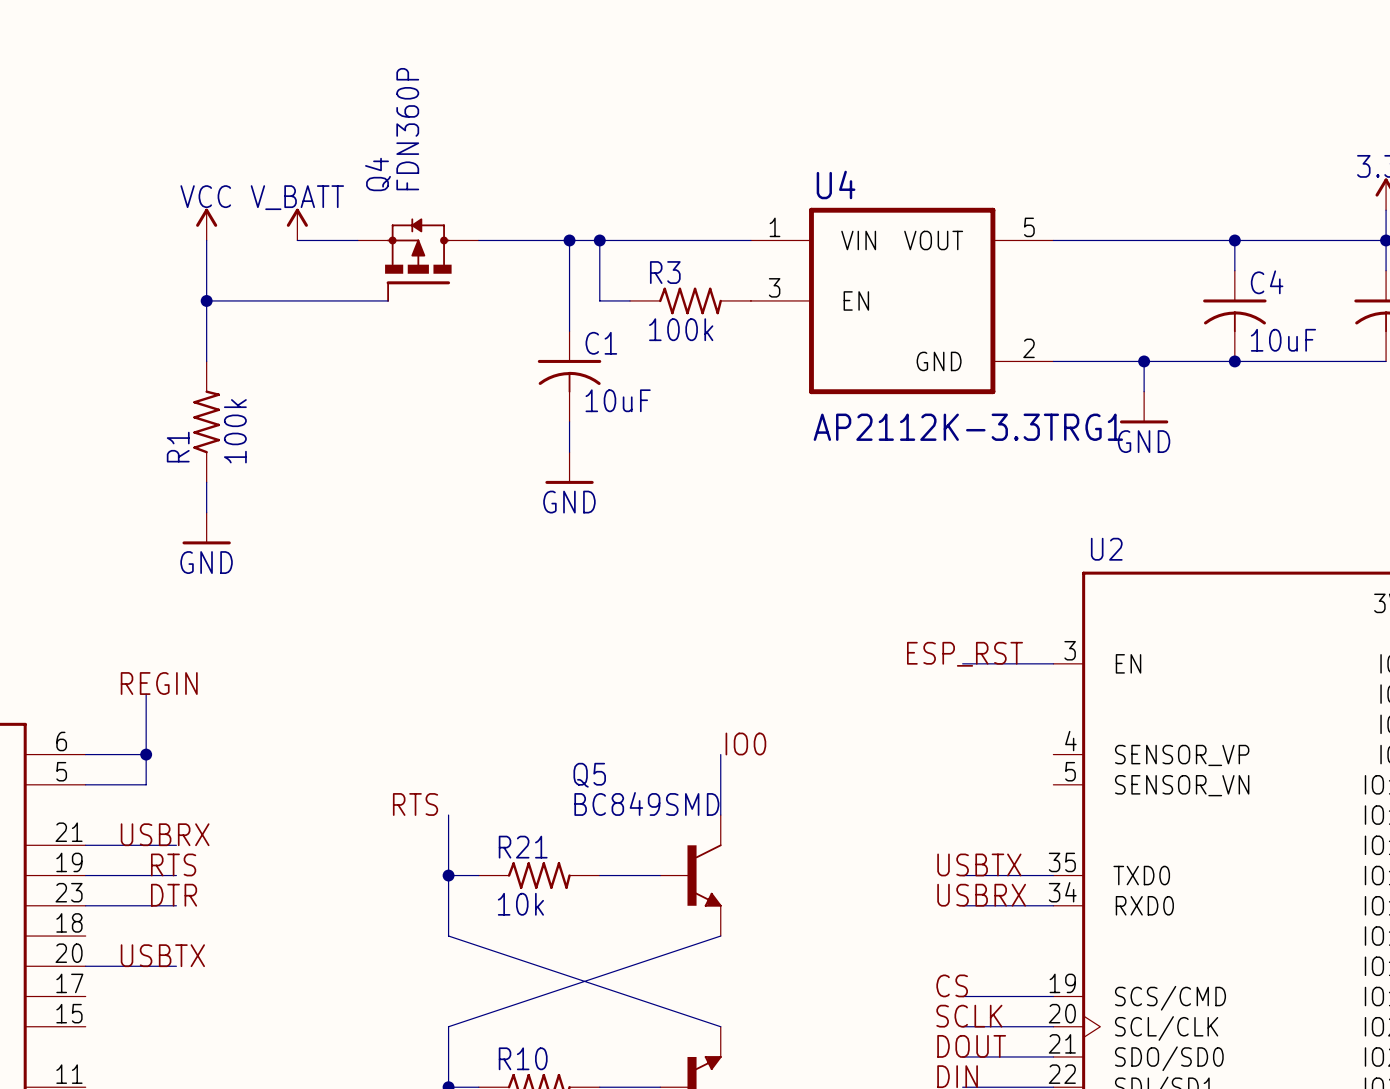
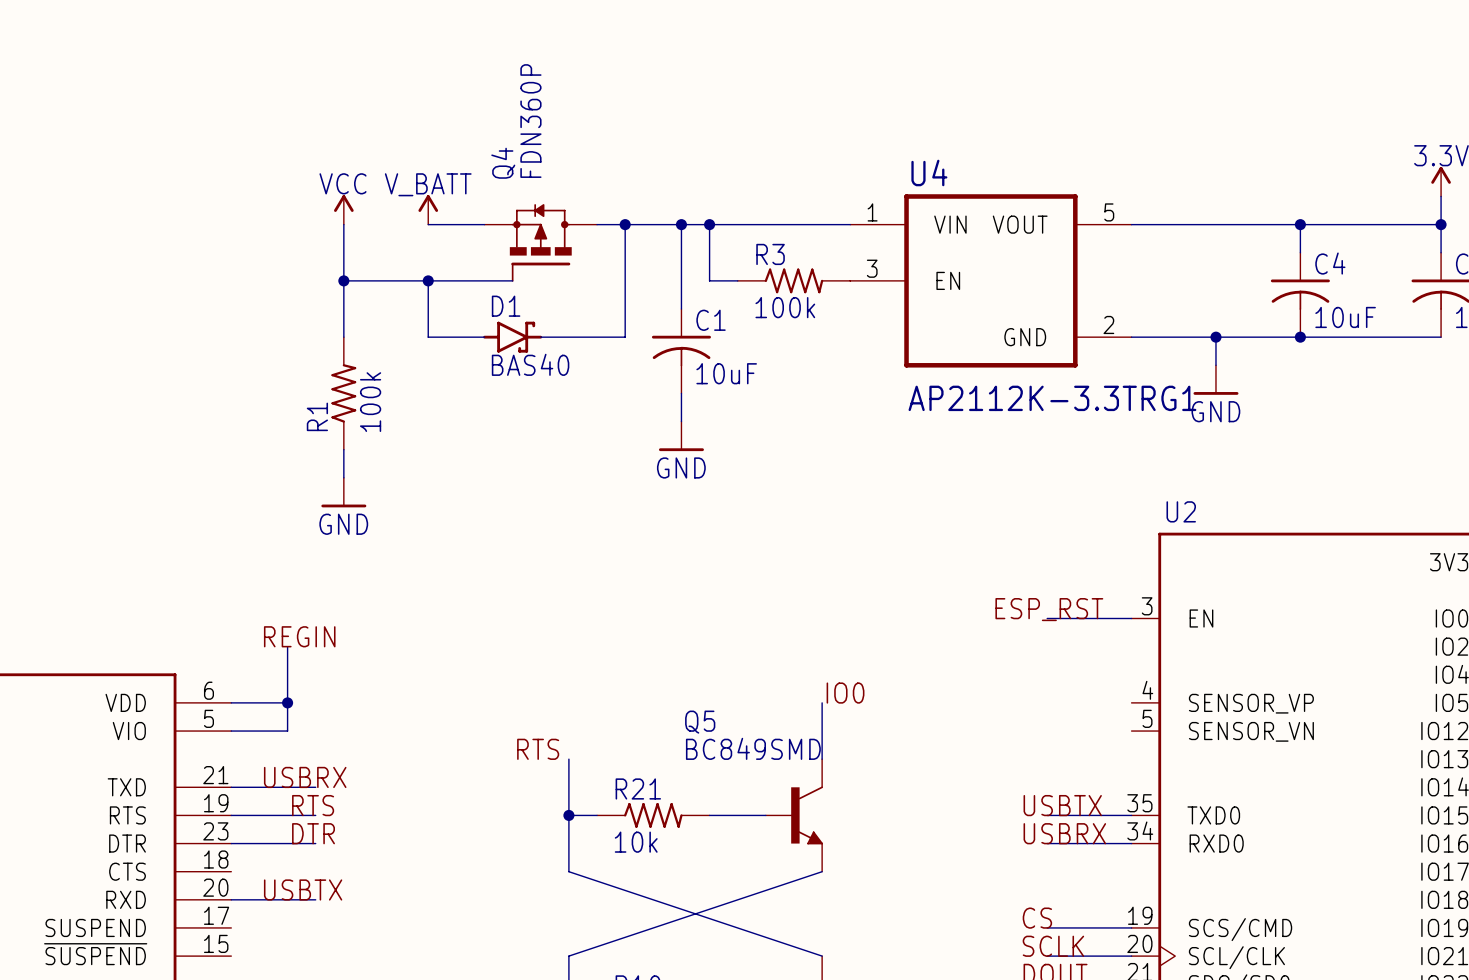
wire: none -> (625, 224) (625, 337) (540, 337)
junction: none -> (625, 224)
wire: none -> (428, 280) (428, 337) (484, 337)
junction: none -> (428, 280)
D1: none -> BAS40 (512, 337)

